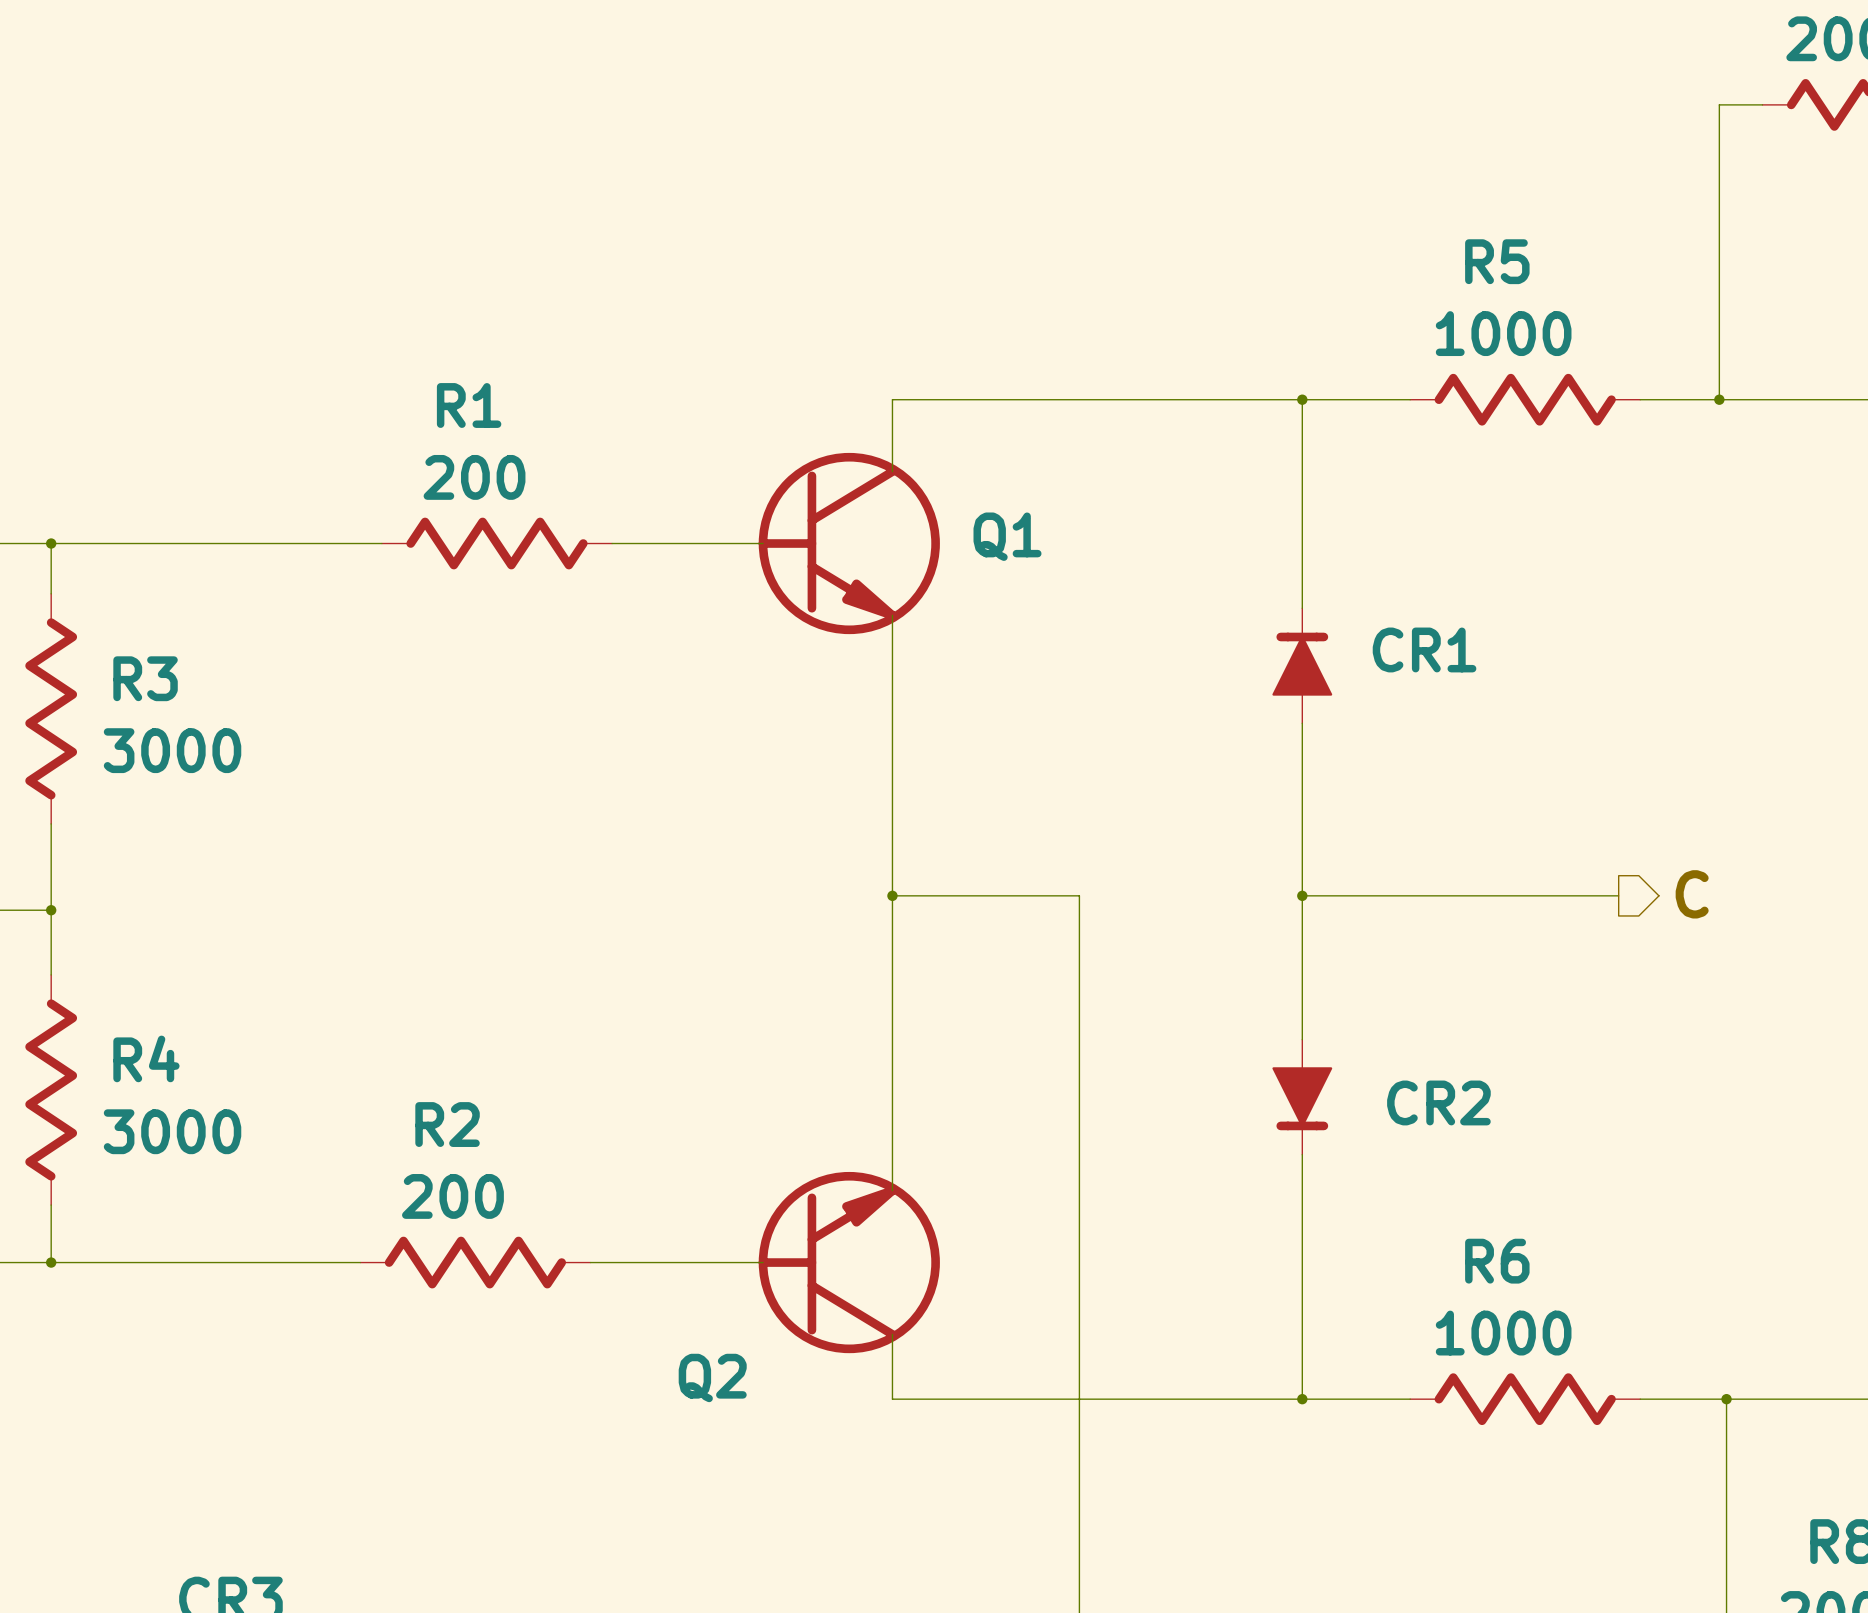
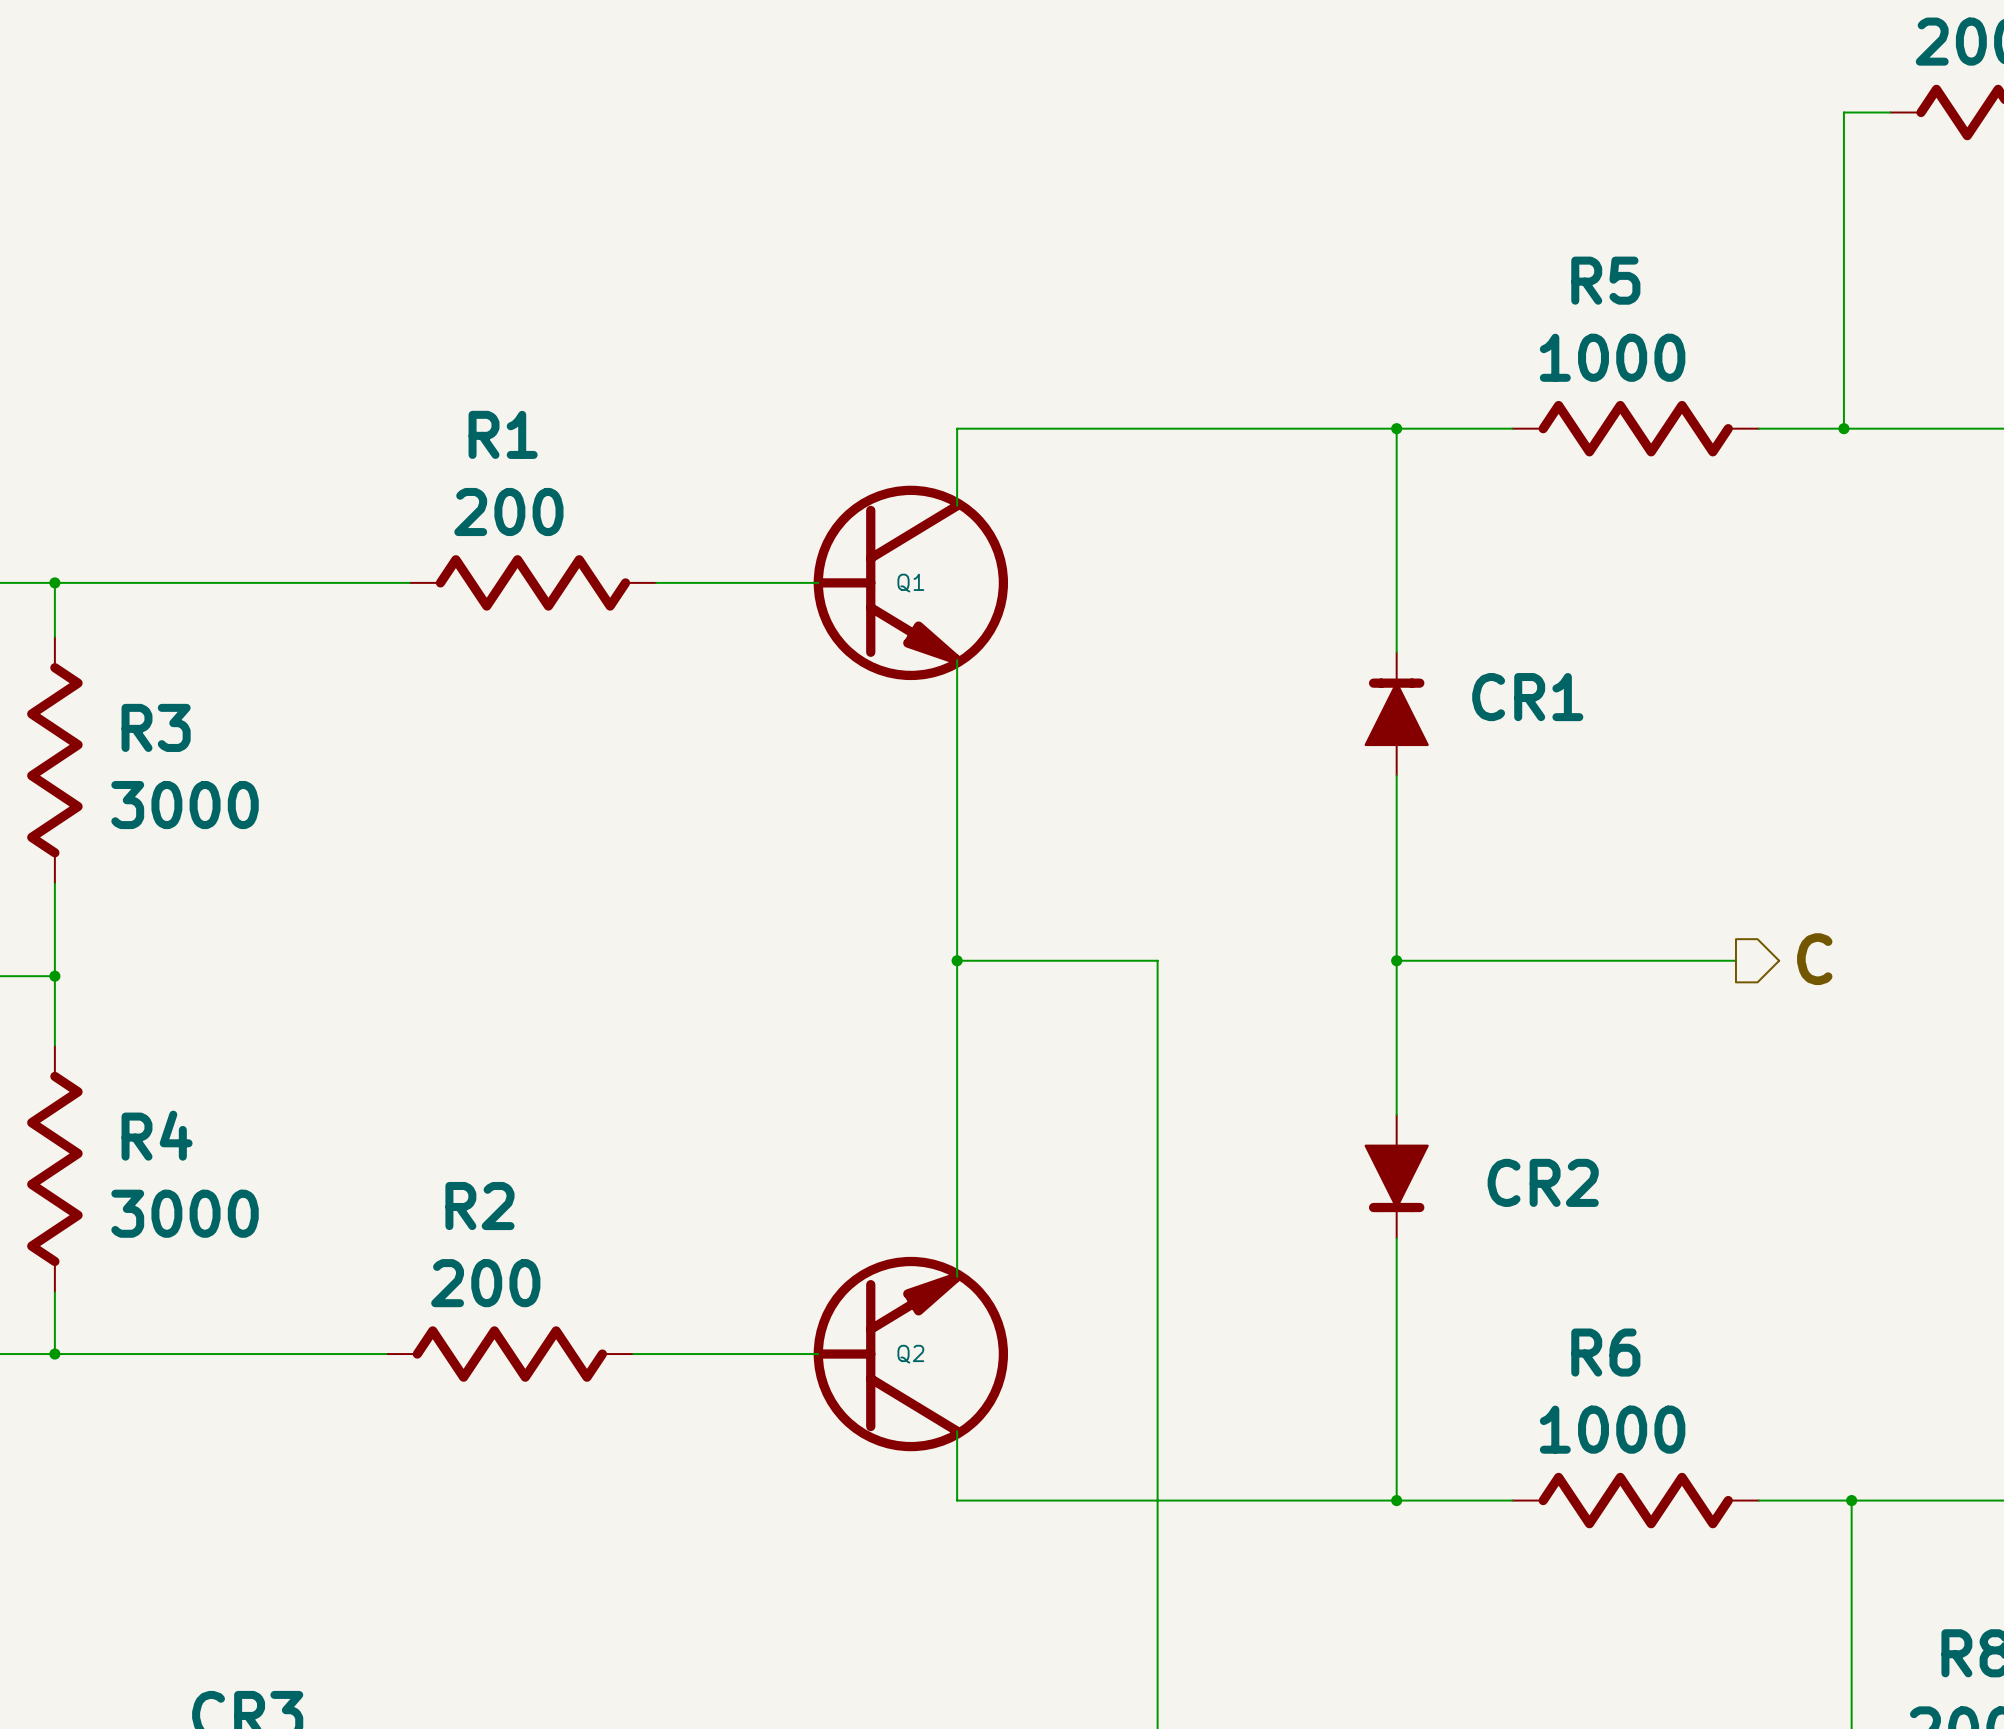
part text: Q1 (1007, 536) -> none
part text: none -> Q1 (910, 583)
part text: none -> Q2 (910, 1354)
part text: Q2 (712, 1377) -> none

